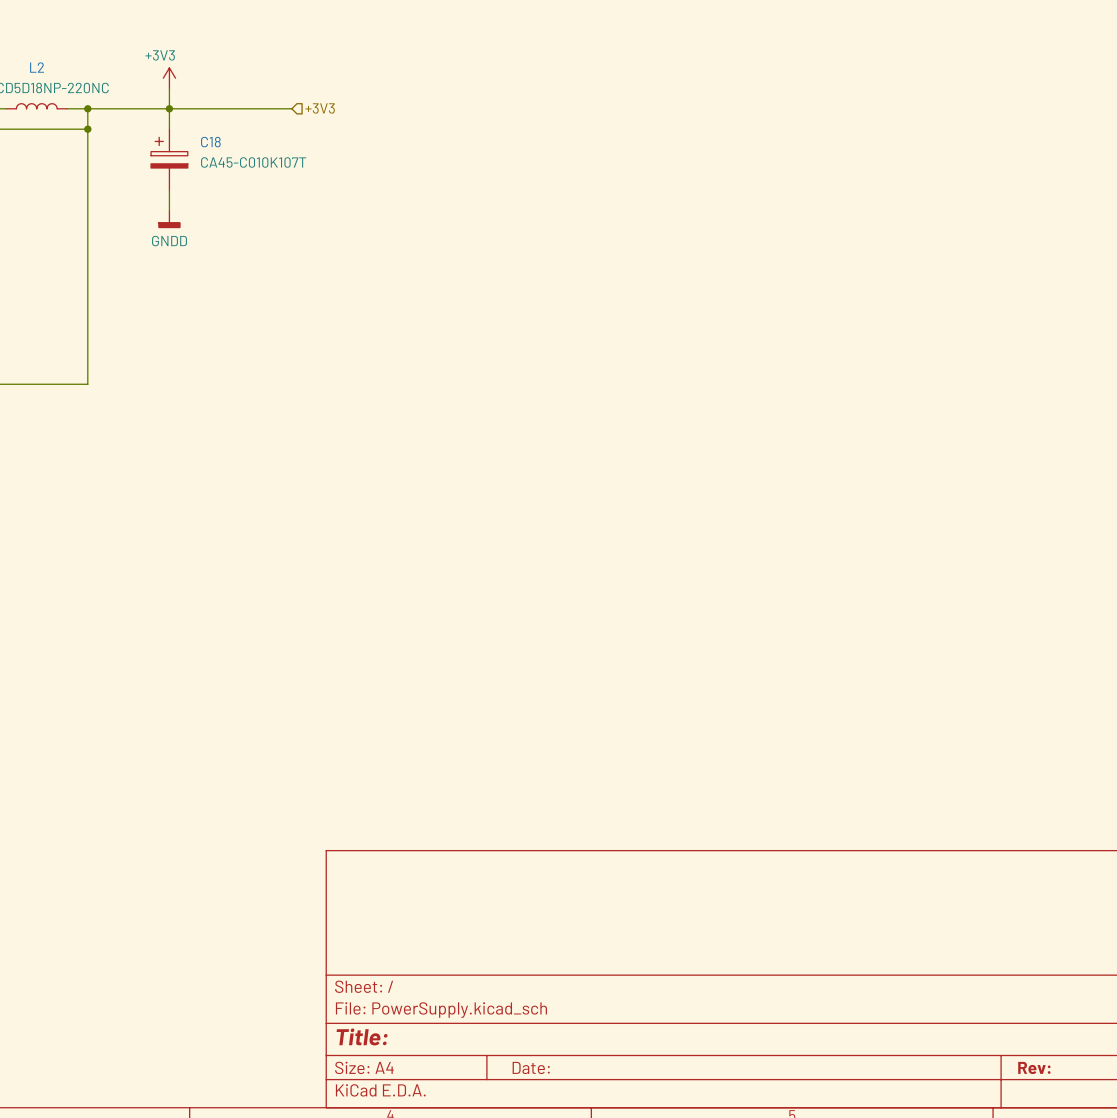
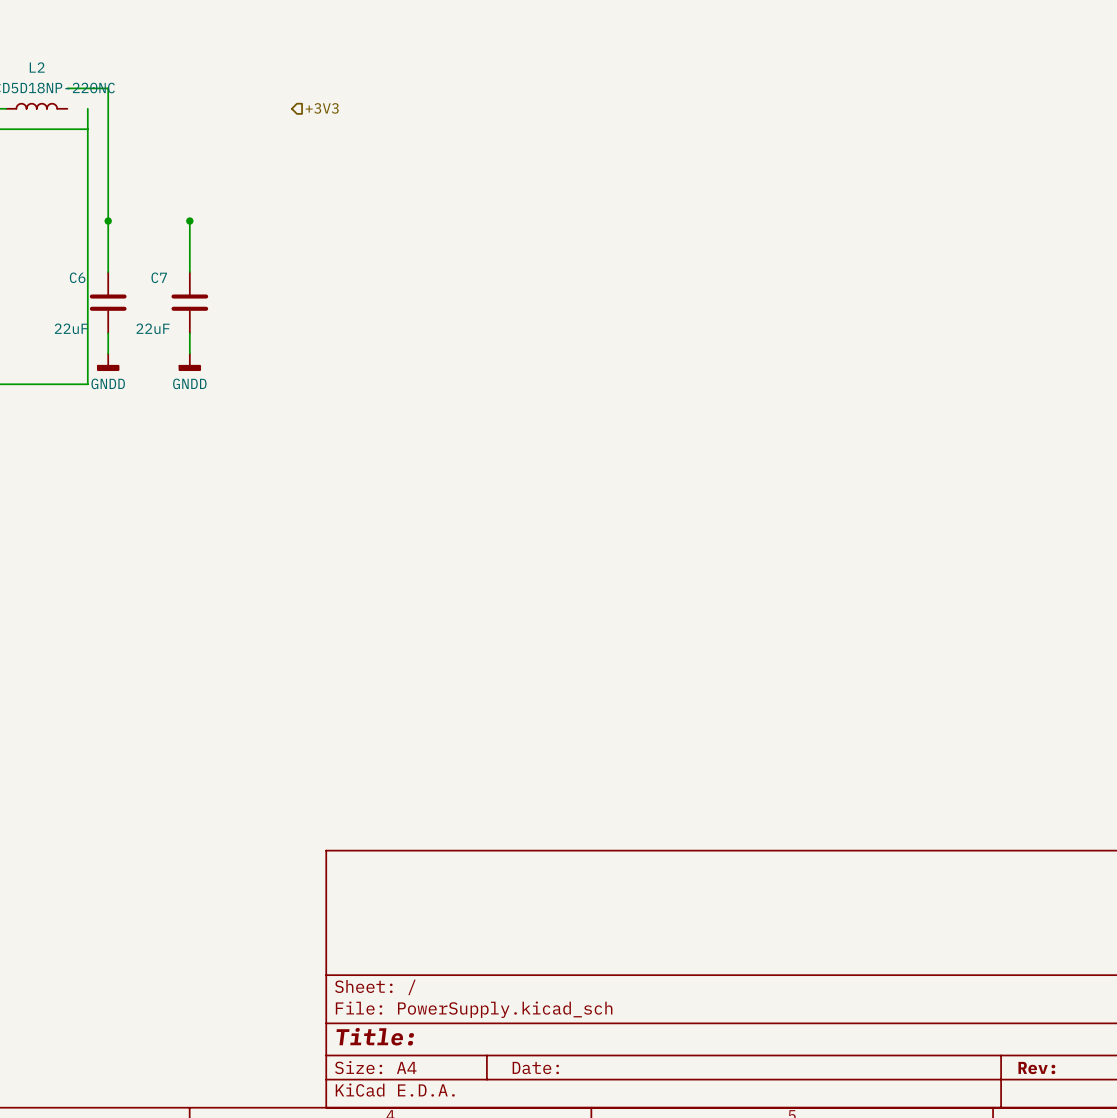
power symbol: +3V3 (169, 78) -> none
wire: none -> (67, 88) (108, 88) (108, 272)
wire: (169, 88) (169, 129) -> none
wire: (67, 108) (291, 108) -> none
junction: (87, 108) -> none
junction: (169, 108) -> none
junction: (87, 129) -> none
C18: CA45-C010K107T (169, 159) -> none
wire: (169, 190) (169, 210) -> (189, 333) (189, 353)
power symbol: GNDD (169, 219) -> none
junction: none -> (108, 221)
wire: none -> (189, 221) (189, 272)
junction: none -> (189, 221)
C6: none -> 22uF (108, 302)
C7: none -> 22uF (189, 302)
wire: none -> (108, 333) (108, 353)
power symbol: none -> GNDD (108, 362)
power symbol: none -> GNDD (189, 362)

